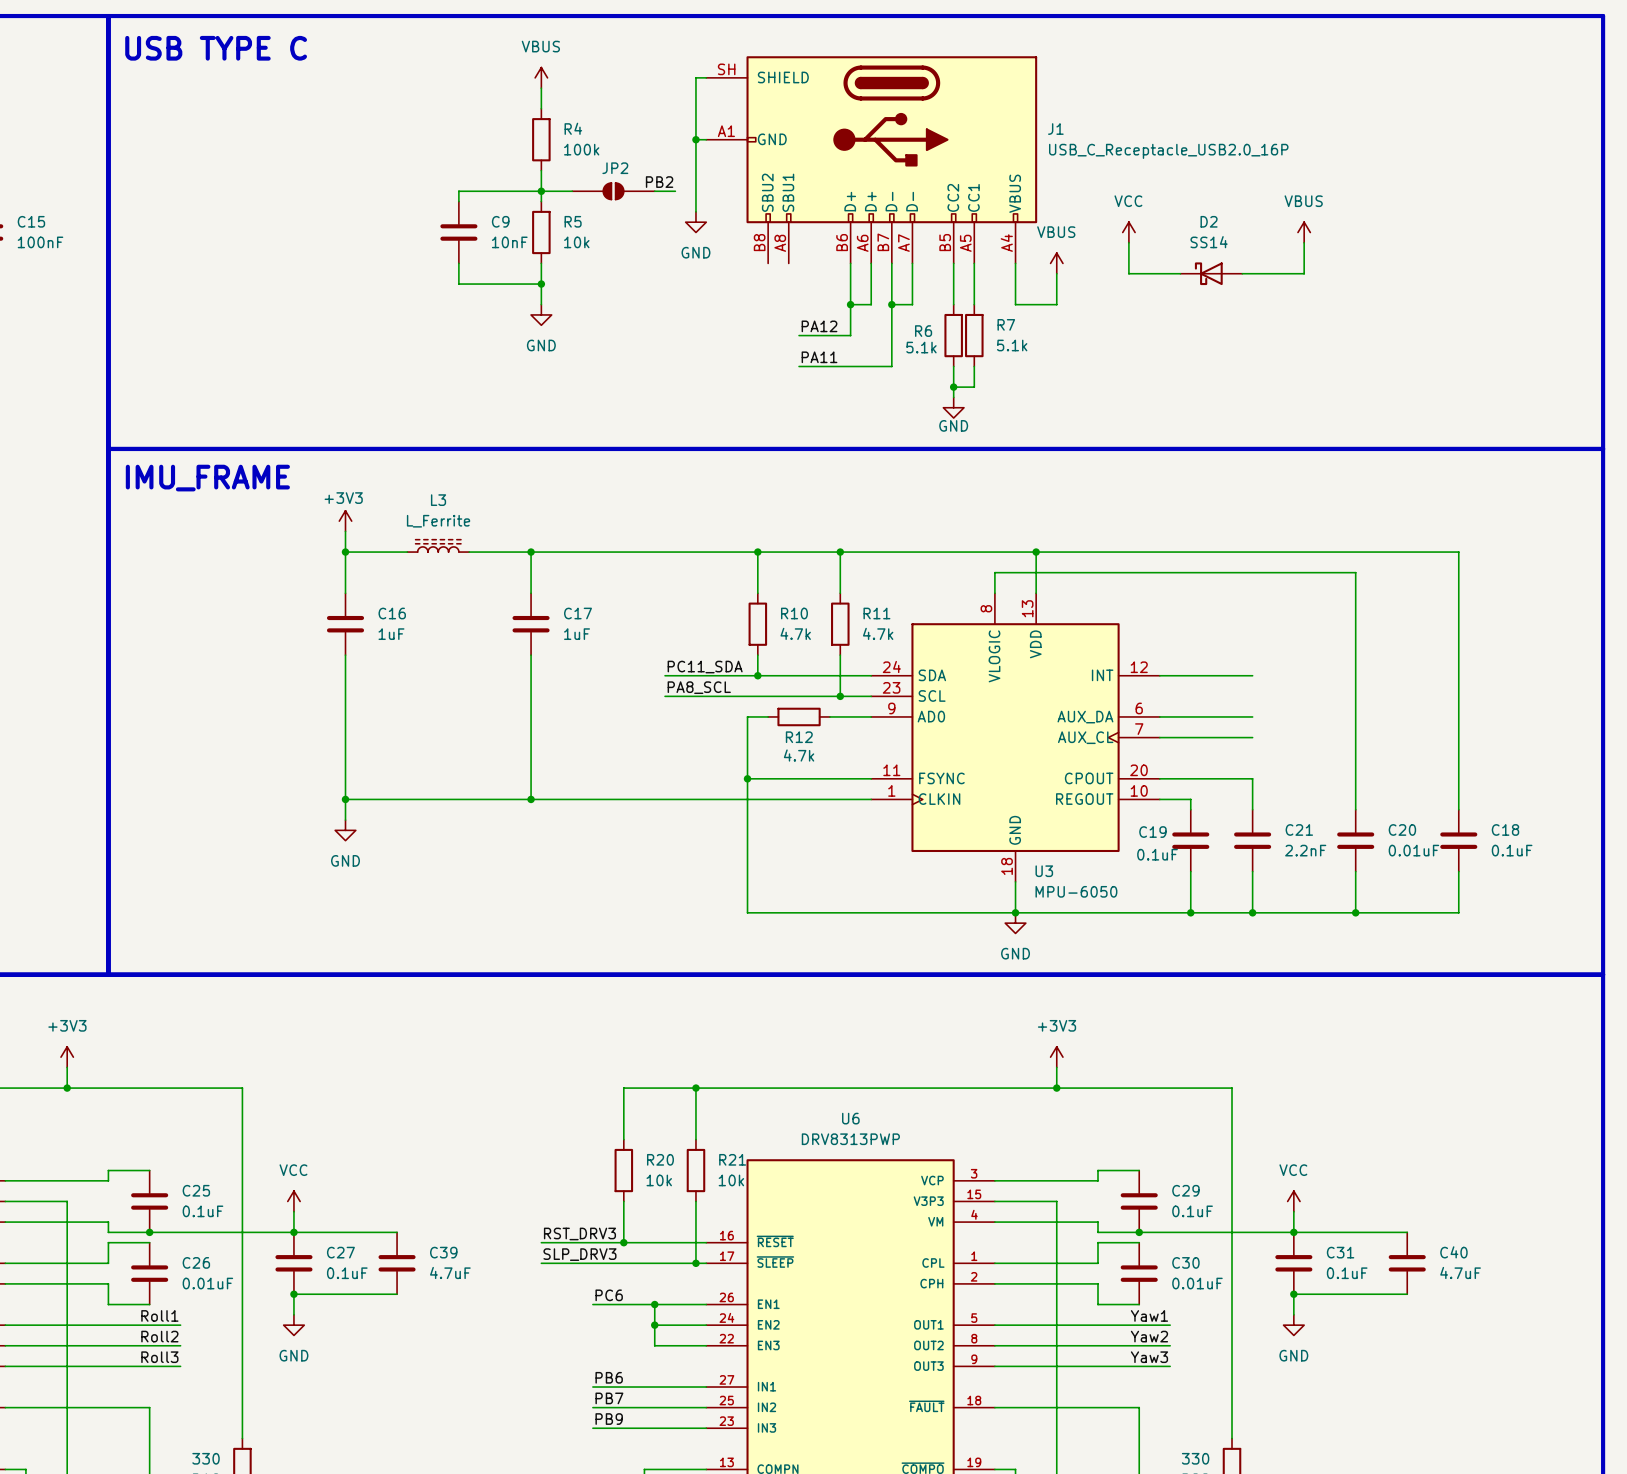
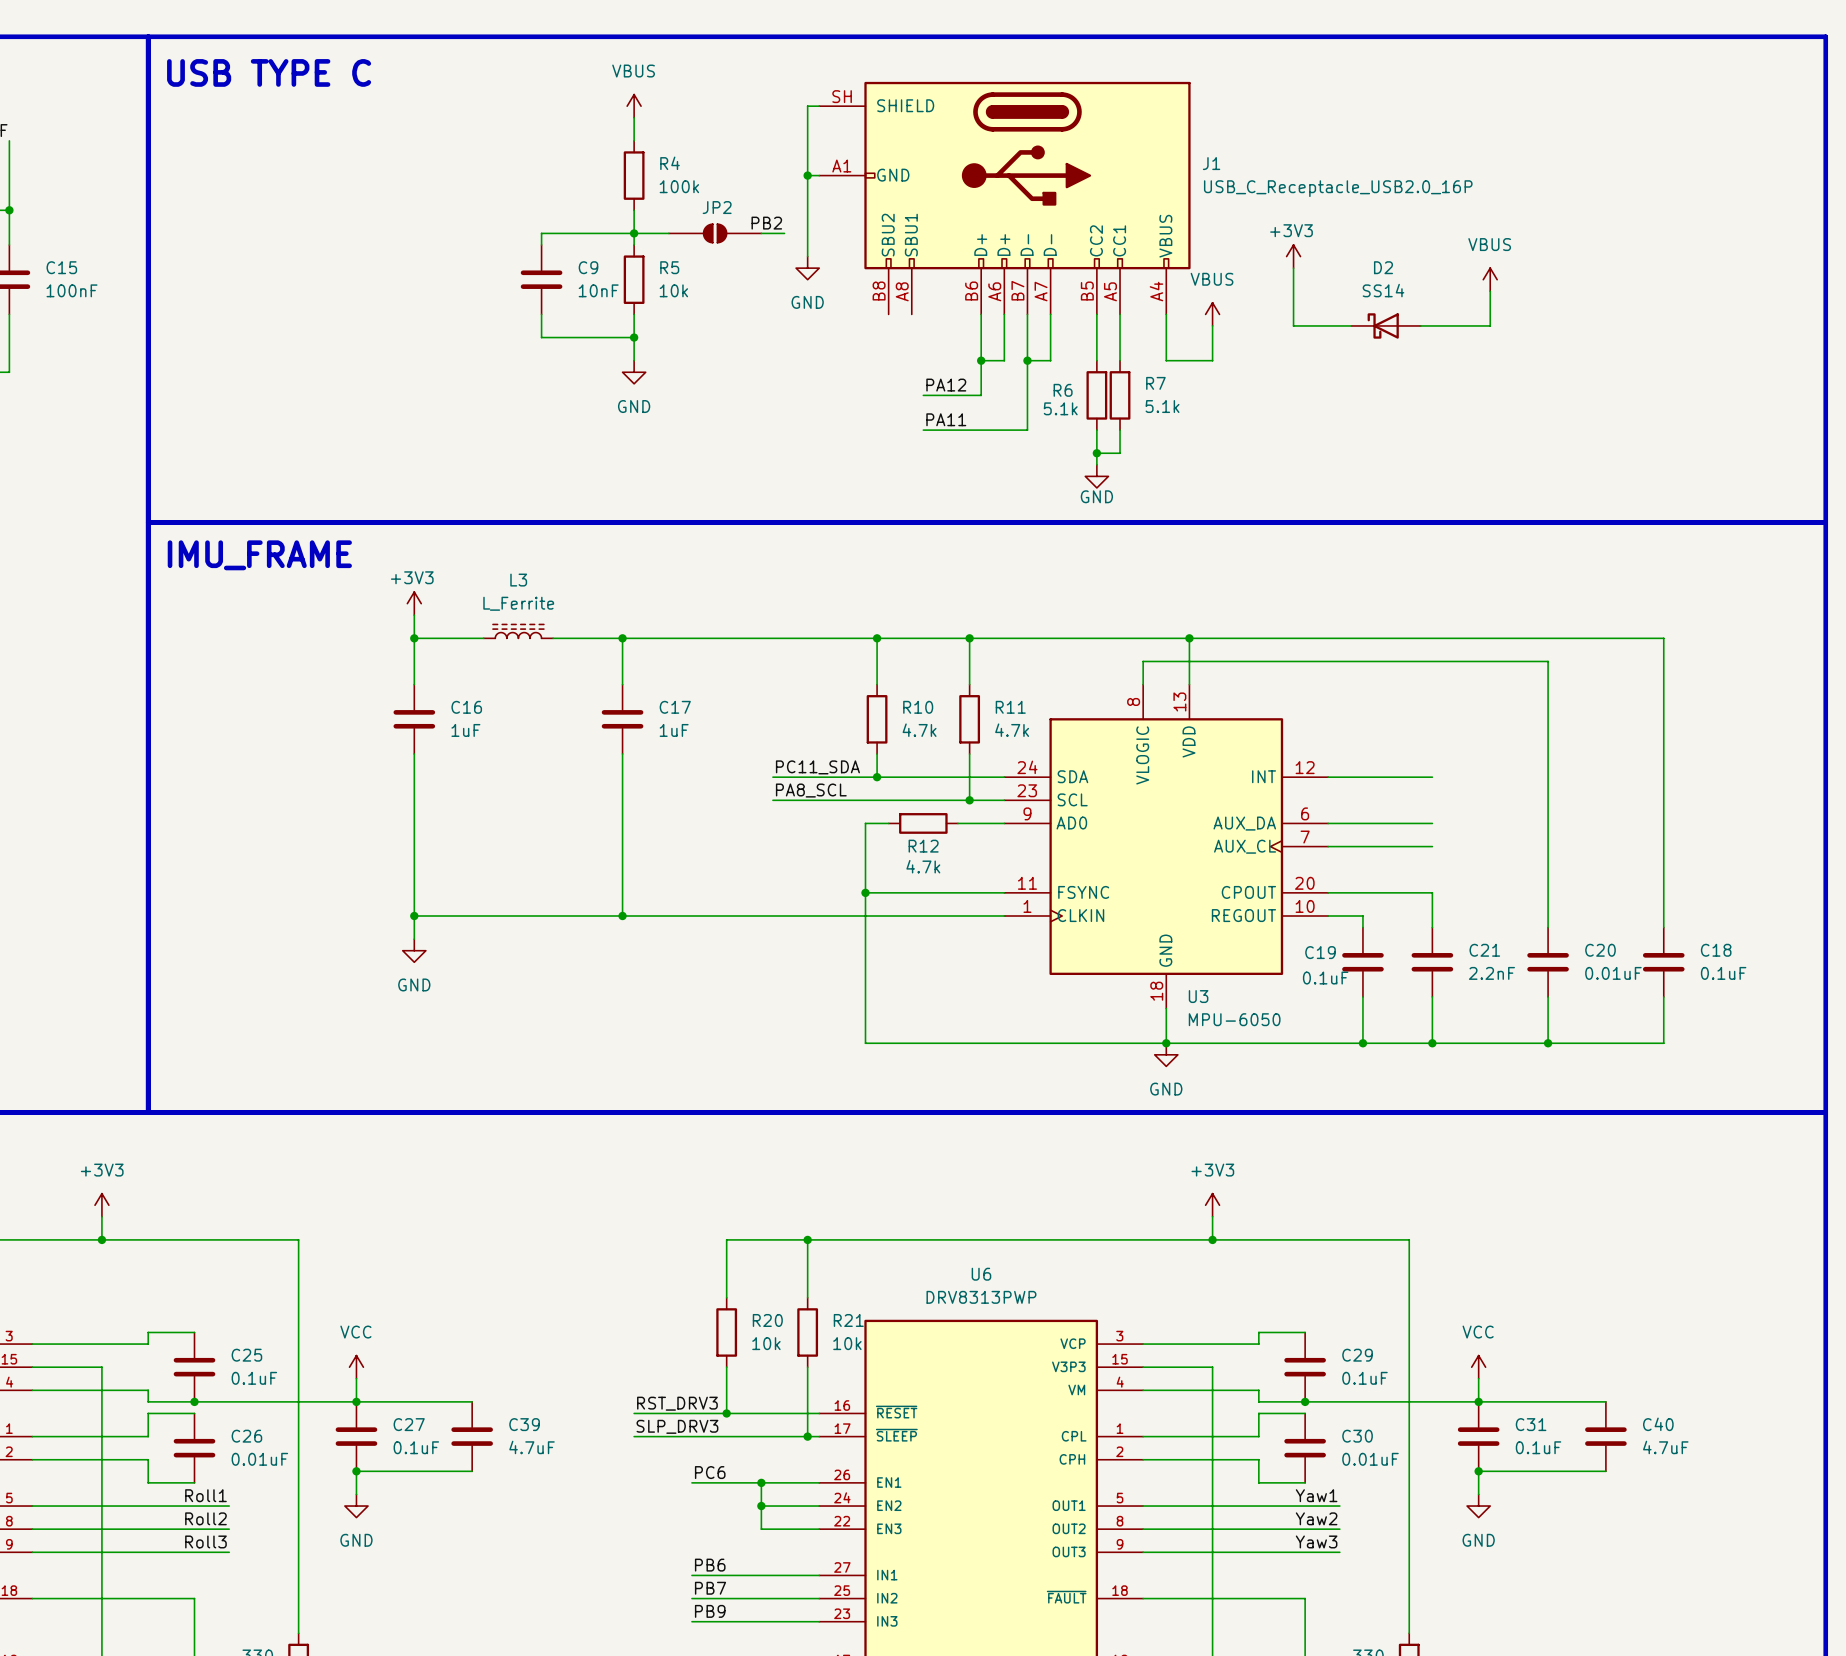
power symbol: none -> +3V3 (1293, 256)
power symbol: VCC (1128, 232) -> none

